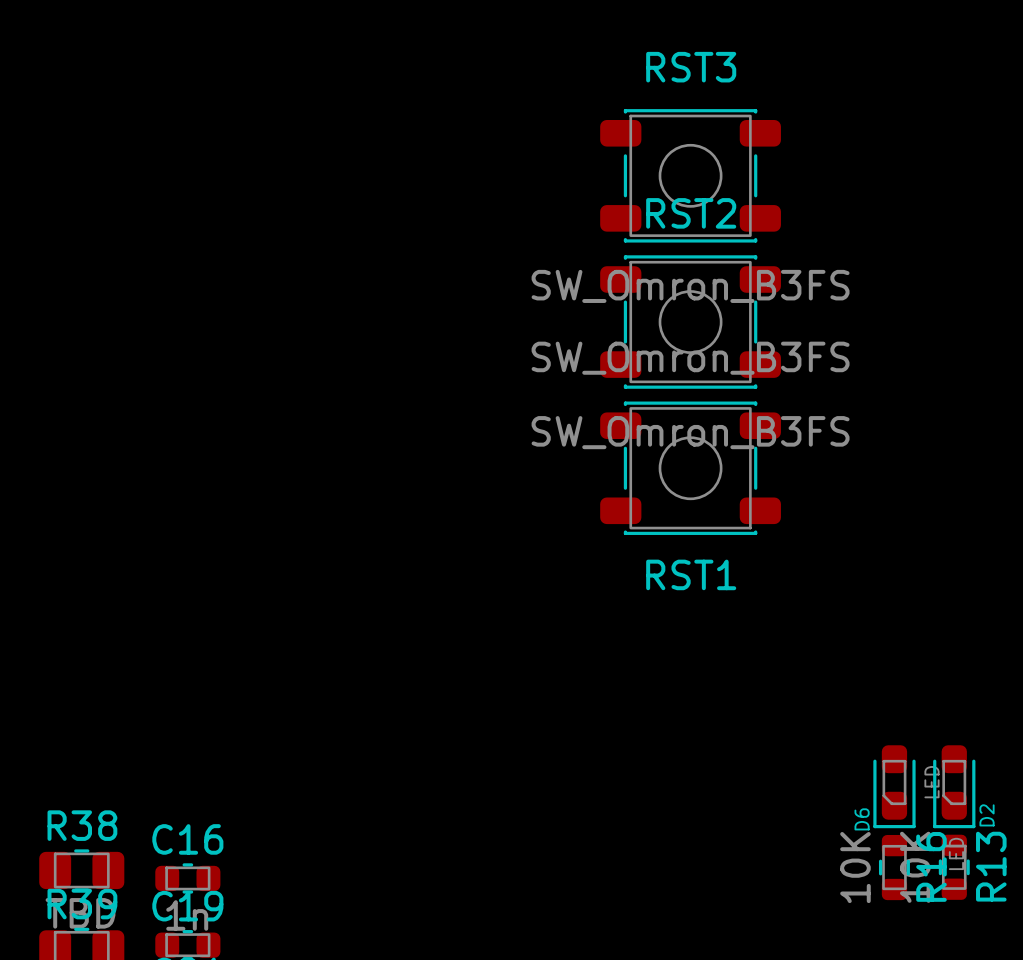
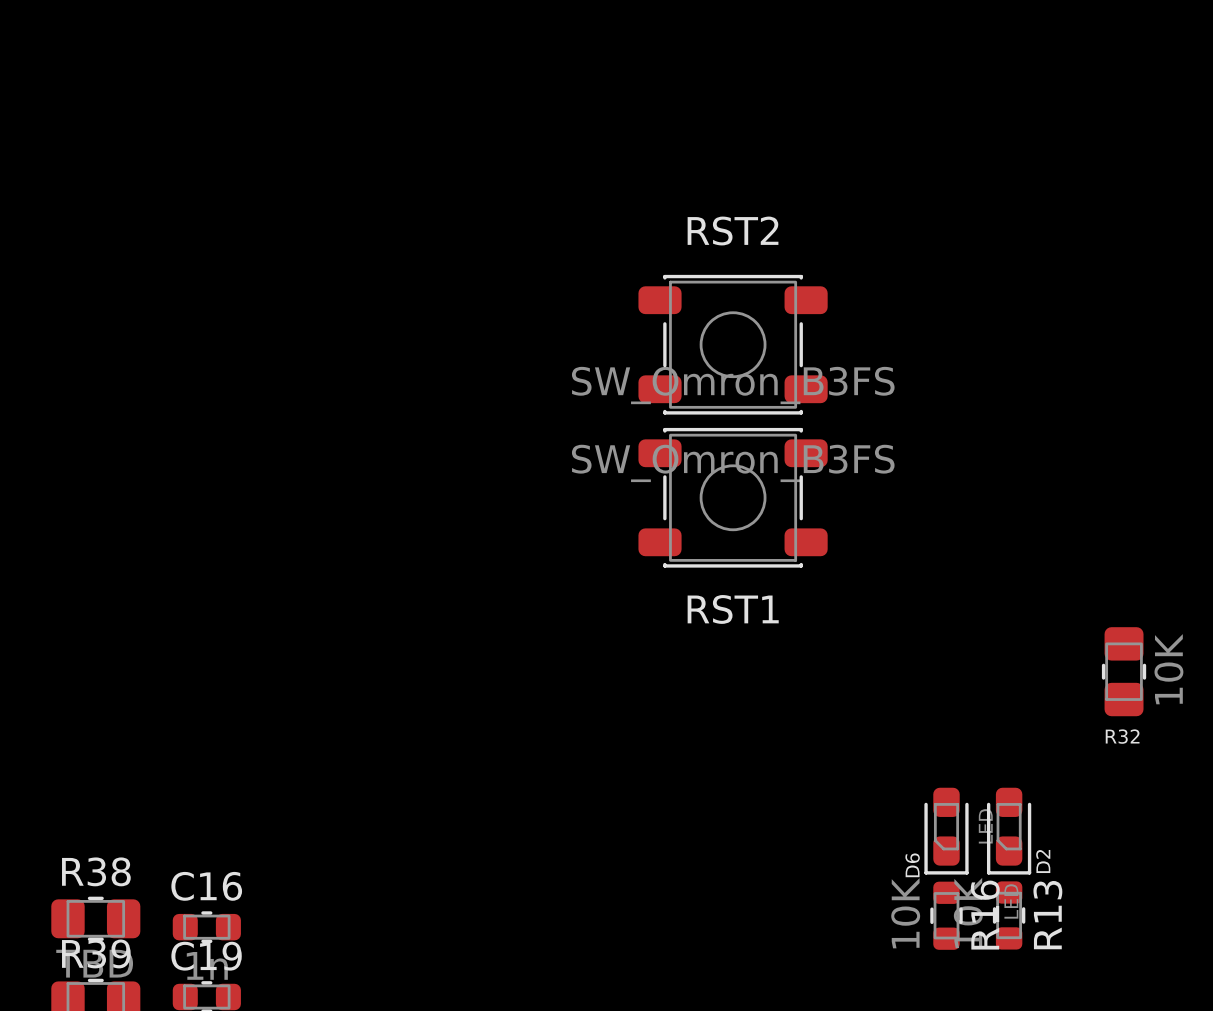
RST3: SW_Omron_B3FS (690, 175) -> none

